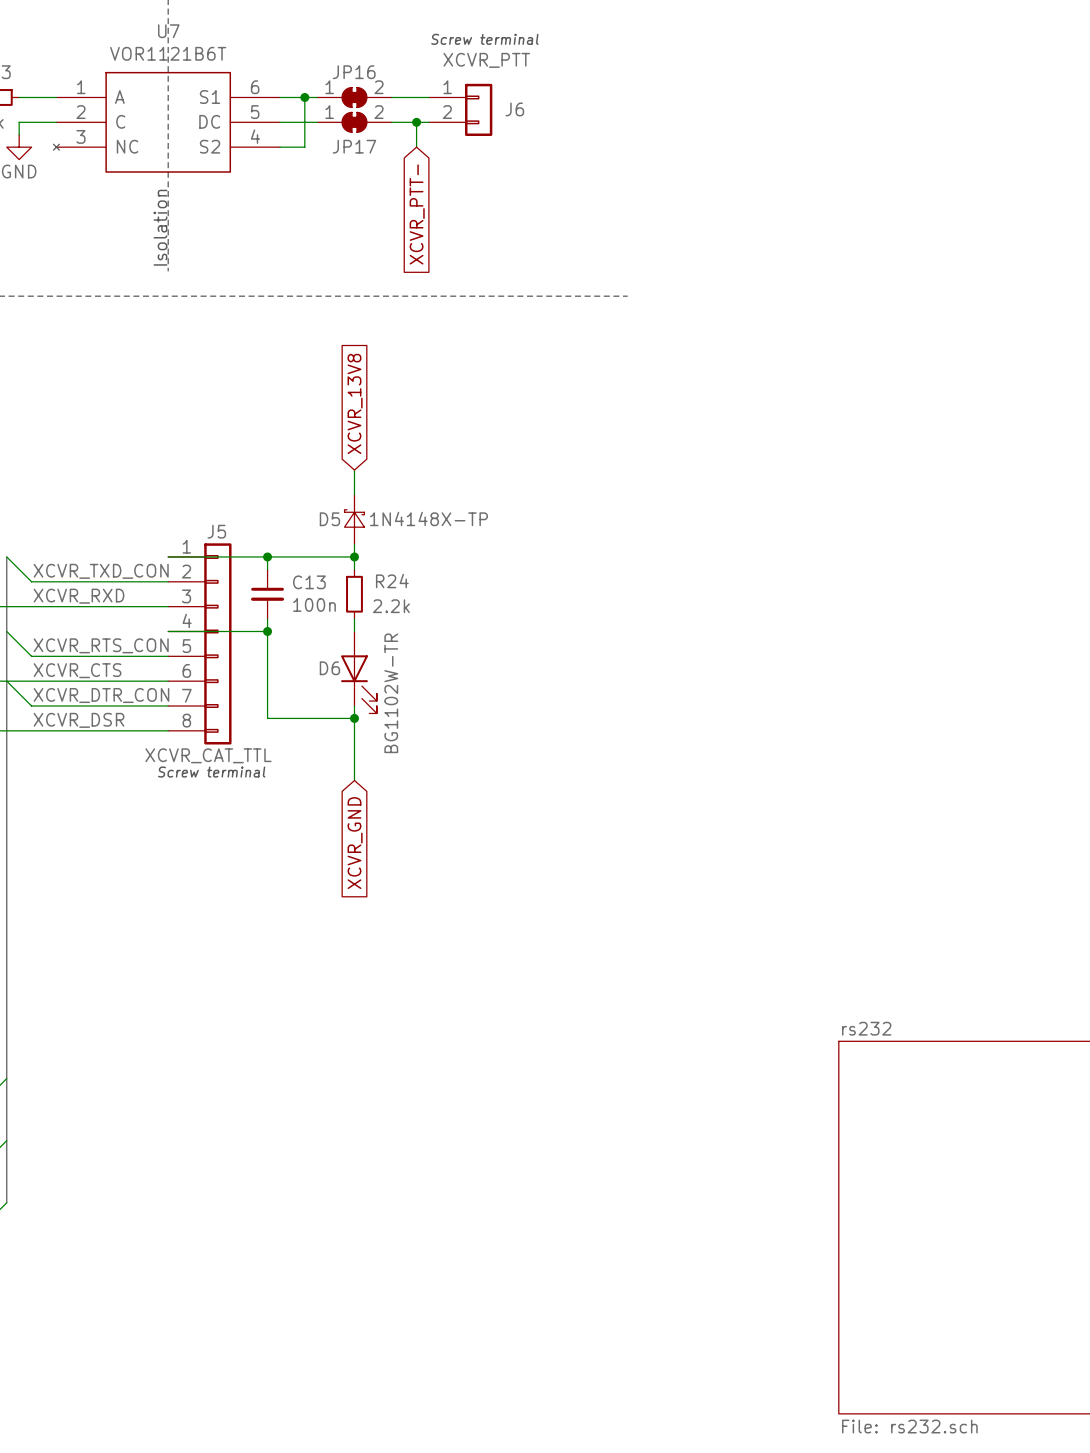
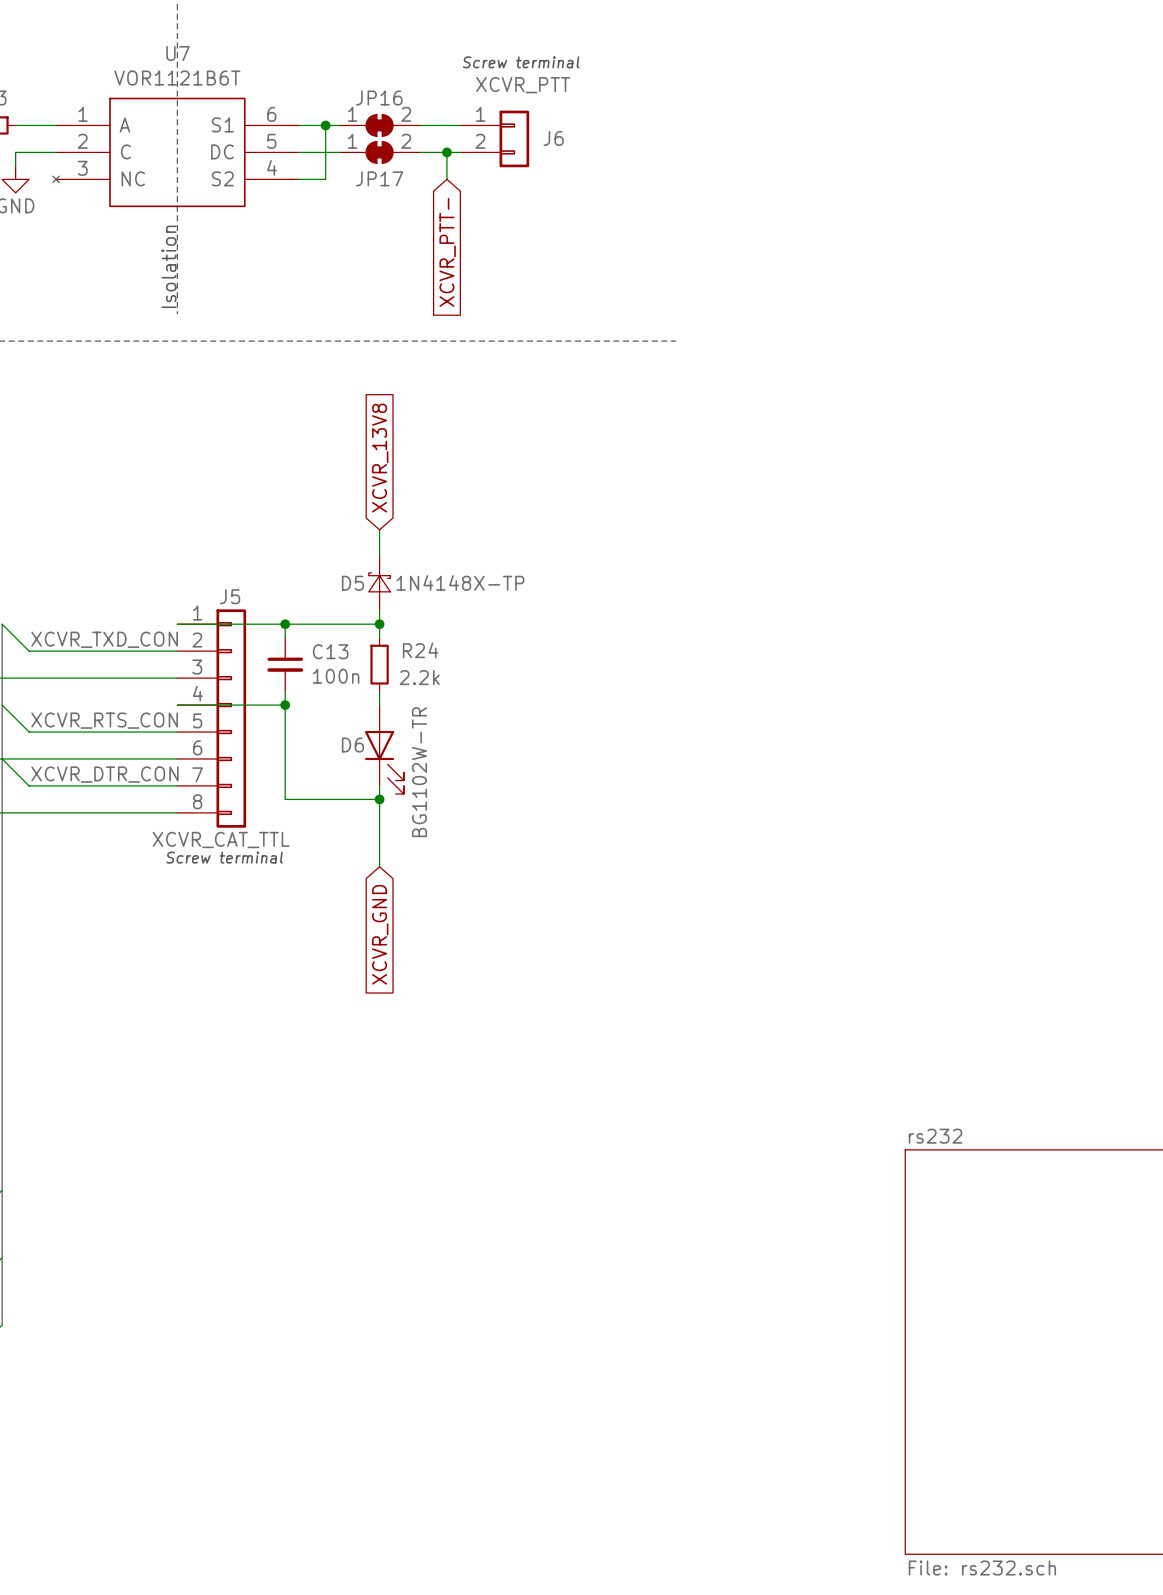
label: XCVR_RXD (79, 596) -> none
label: XCVR_CTS (77, 670) -> none
label: XCVR_DSR (79, 720) -> none

